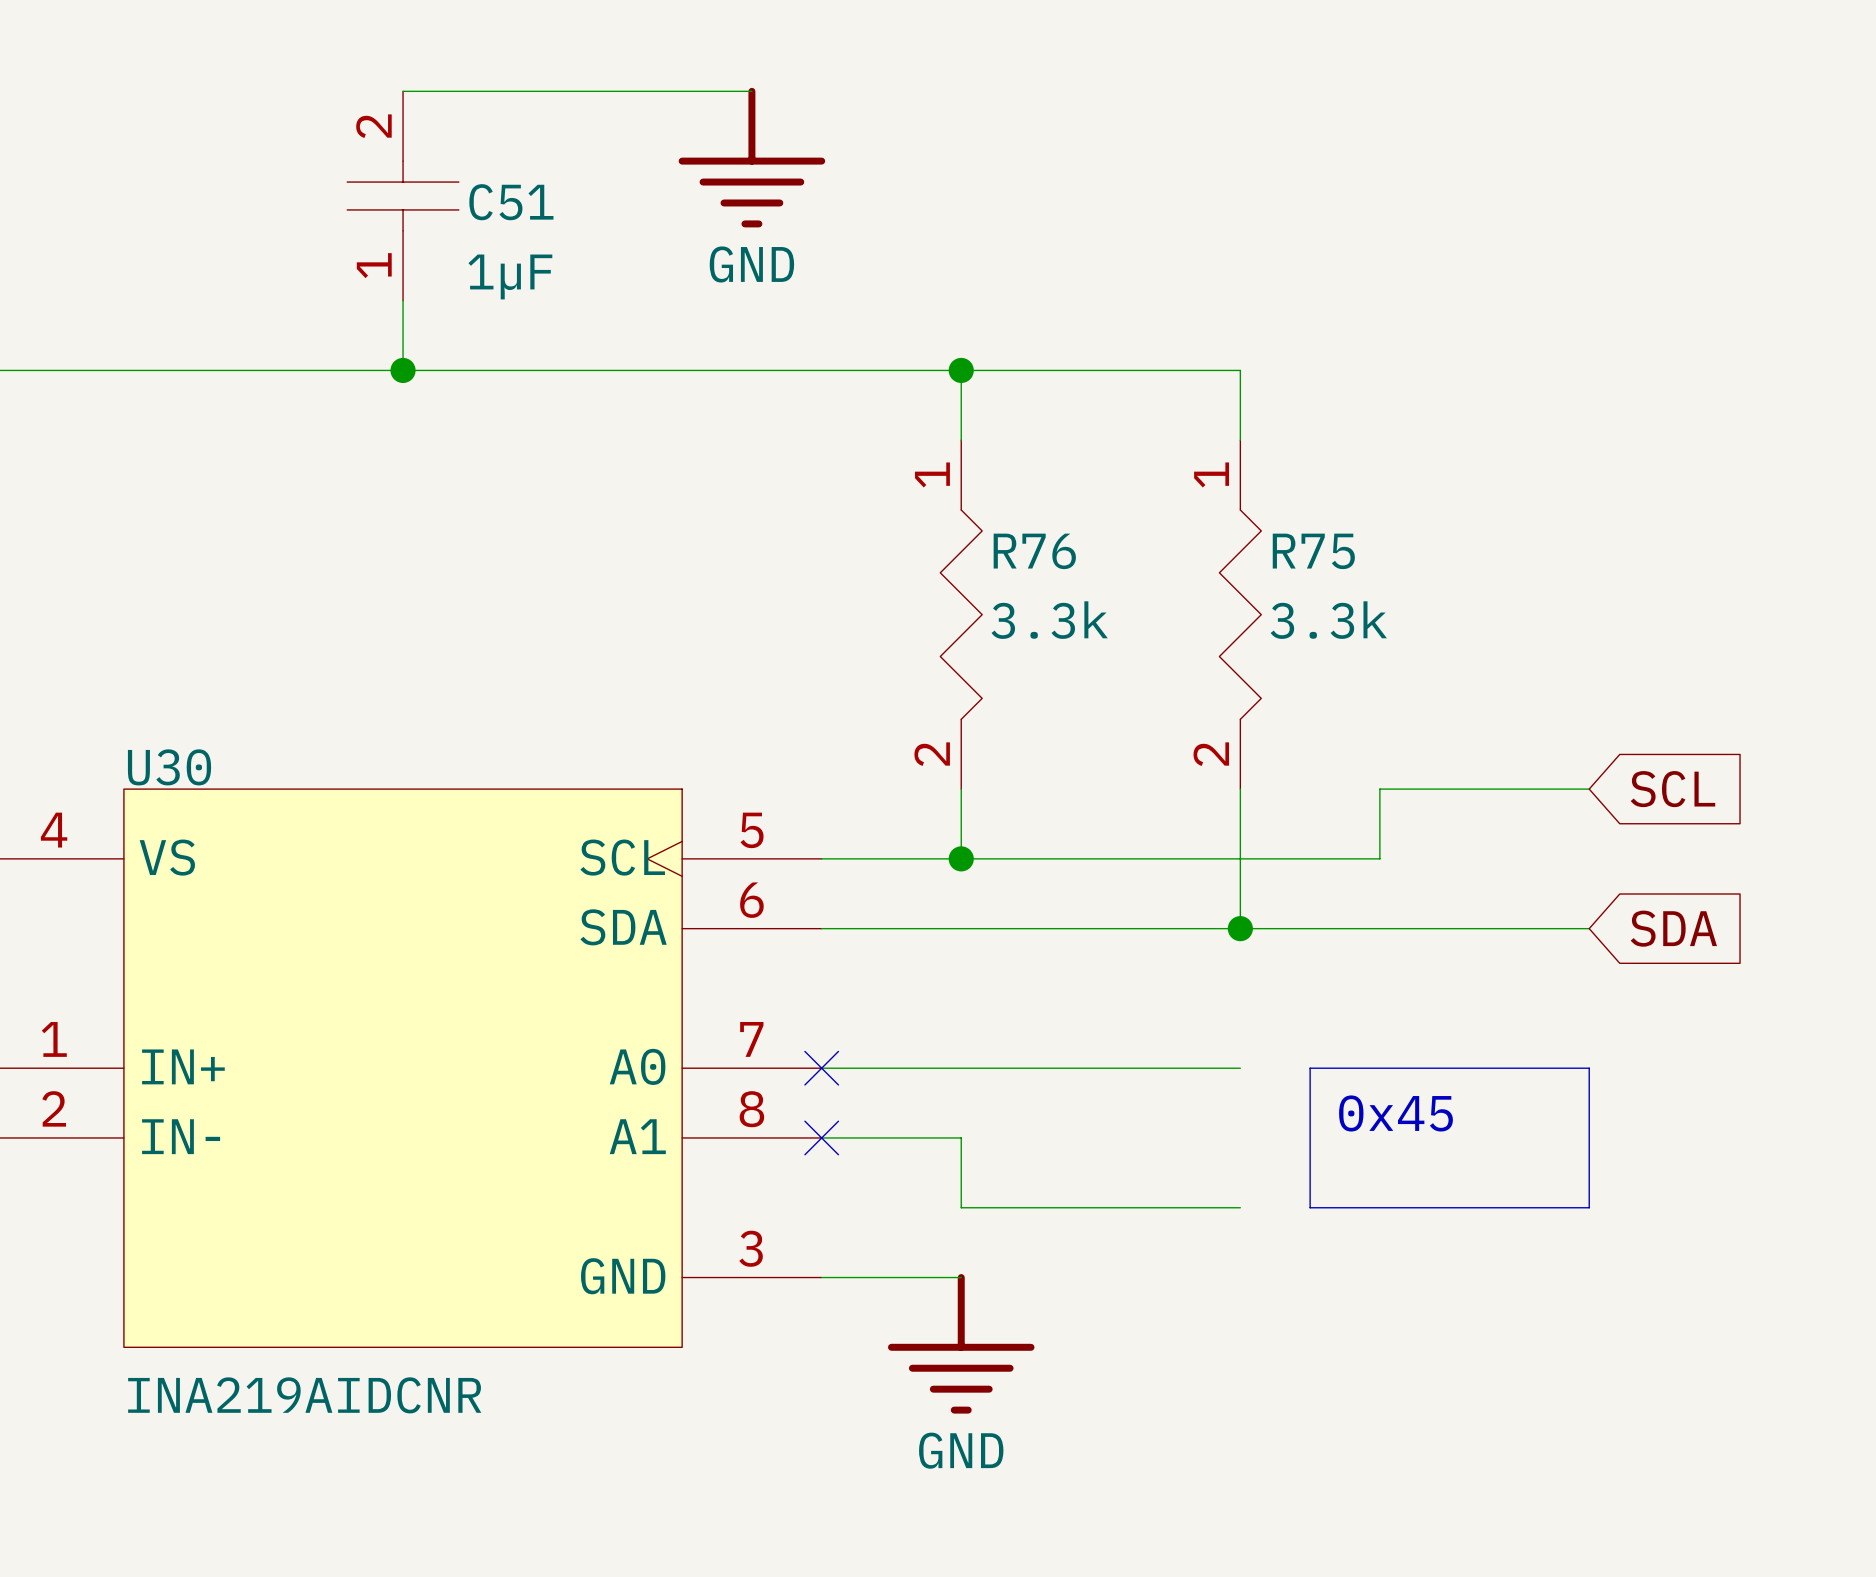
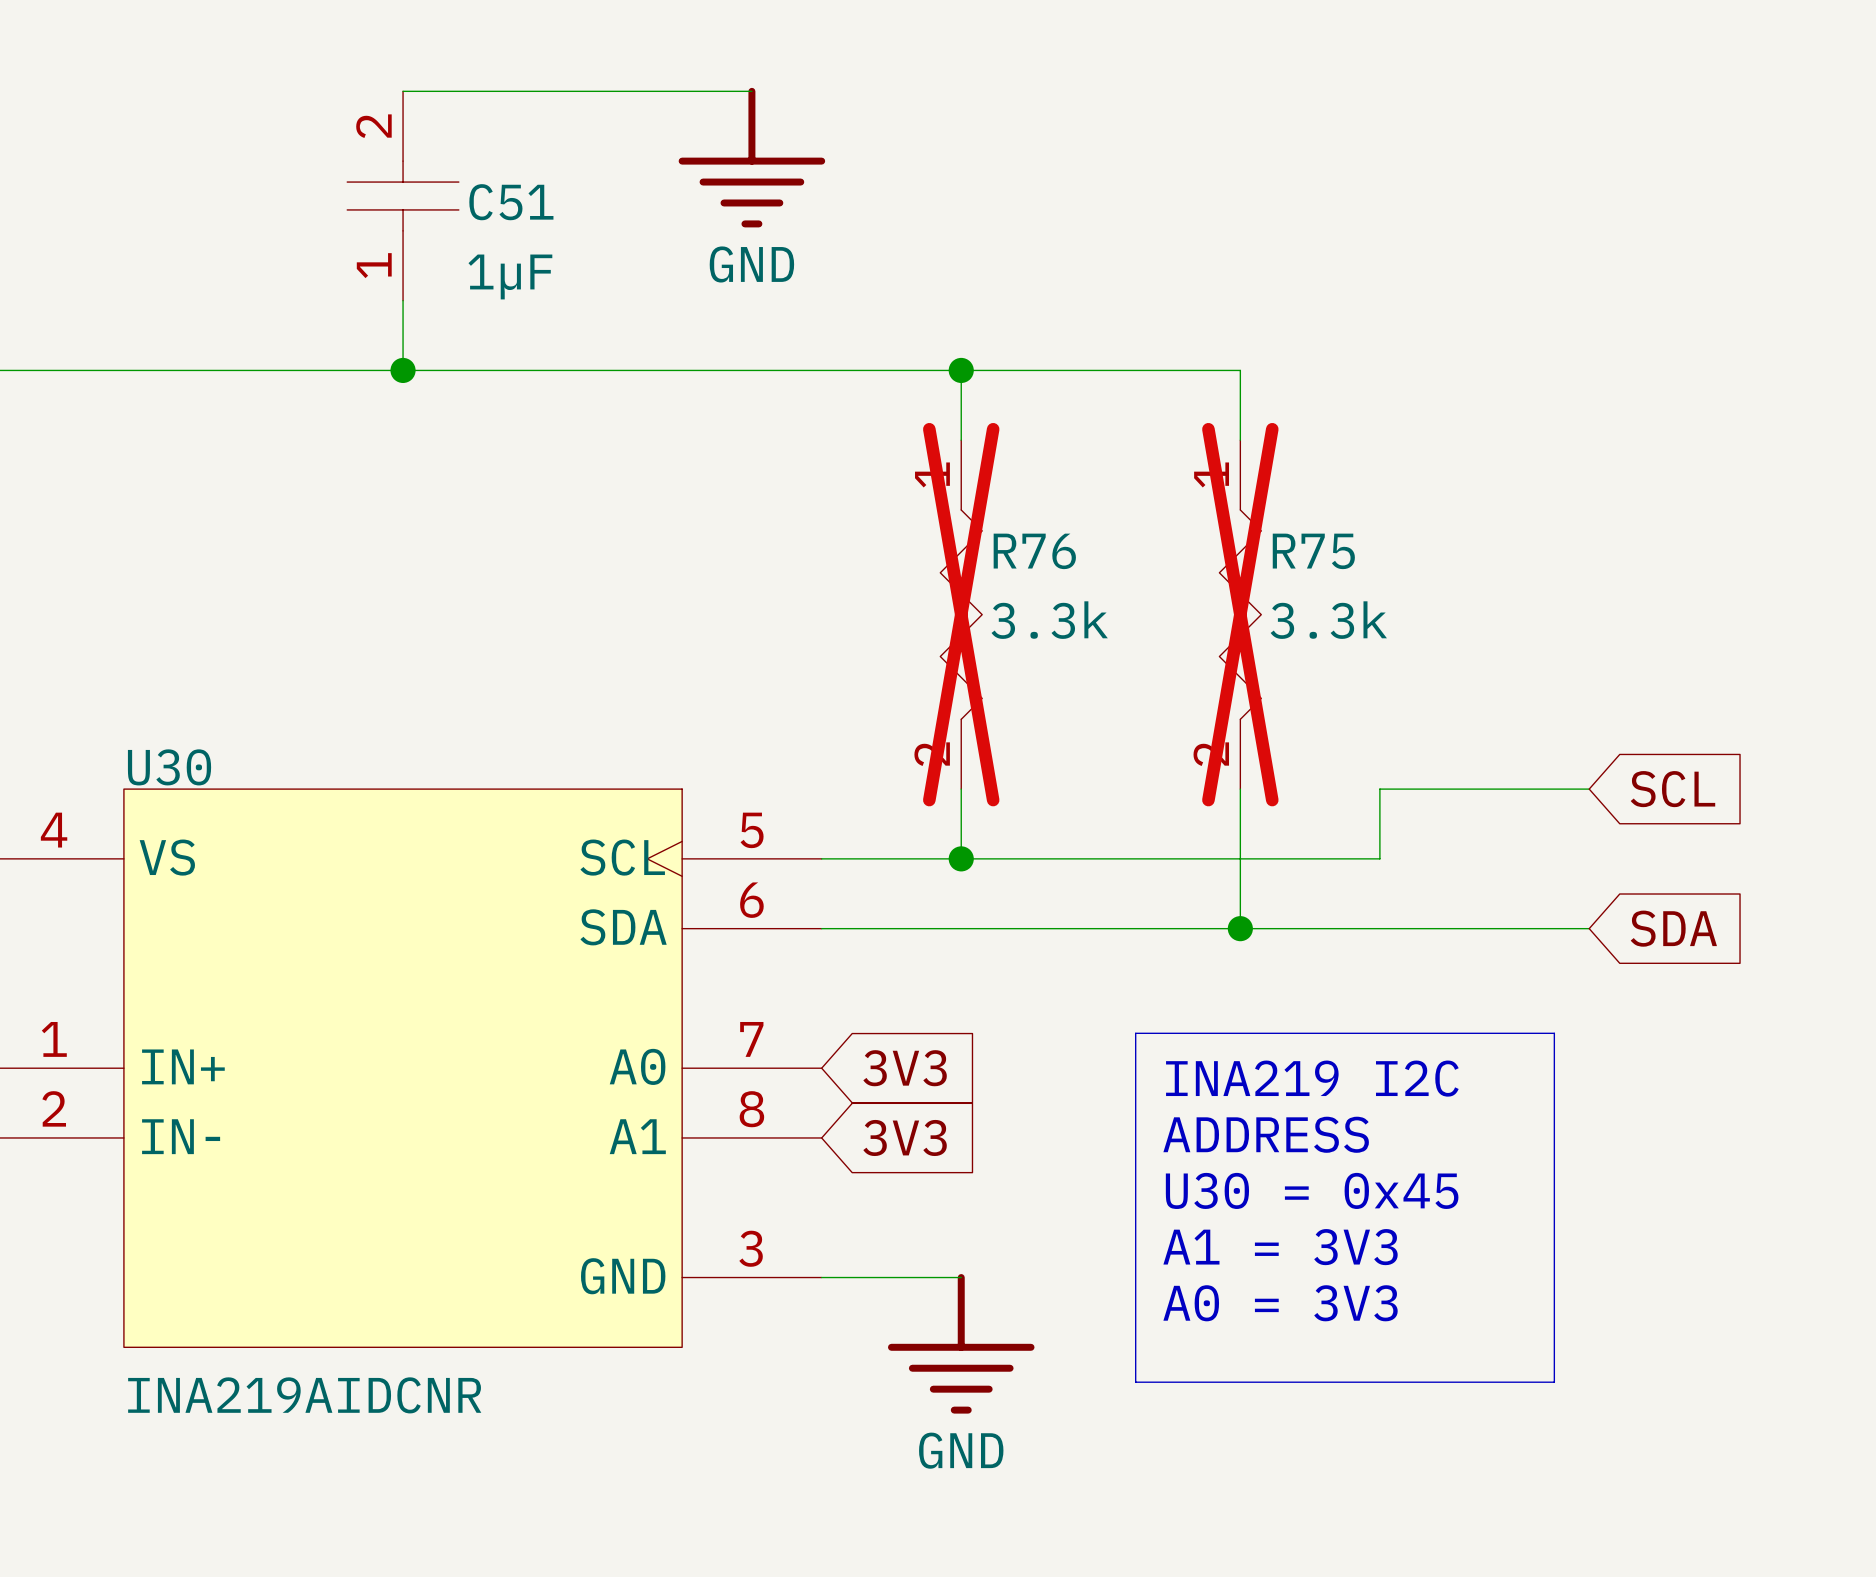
R76 do-not-place cross: none -> (961, 614)
R75 do-not-place cross: none -> (1240, 614)
line: none -> (1135, 1033) (1554, 1033) (1554, 1382) (1135, 1382) (1135, 1033)
wire: (821, 1068) (1240, 1068) -> none
no-connect mark: (821, 1068) -> none
global label: none -> 3V3 (905, 1068)
line: (1310, 1068) (1589, 1068) (1589, 1207) (1310, 1207) (1310, 1068) -> none
text: none -> INA219 I2C (1312, 1078)
text: 0x45 (1395, 1113) -> none
text: none -> ADDRESS (1266, 1134)
wire: (821, 1137) (961, 1137) (961, 1207) (1240, 1207) -> none
no-connect mark: (821, 1137) -> none
global label: none -> 3V3 (905, 1137)
text: none -> U30 = 0x45 (1312, 1190)
text: none -> A1 = 3V3 (1280, 1247)
text: none -> A0 = 3V3 (1280, 1303)

